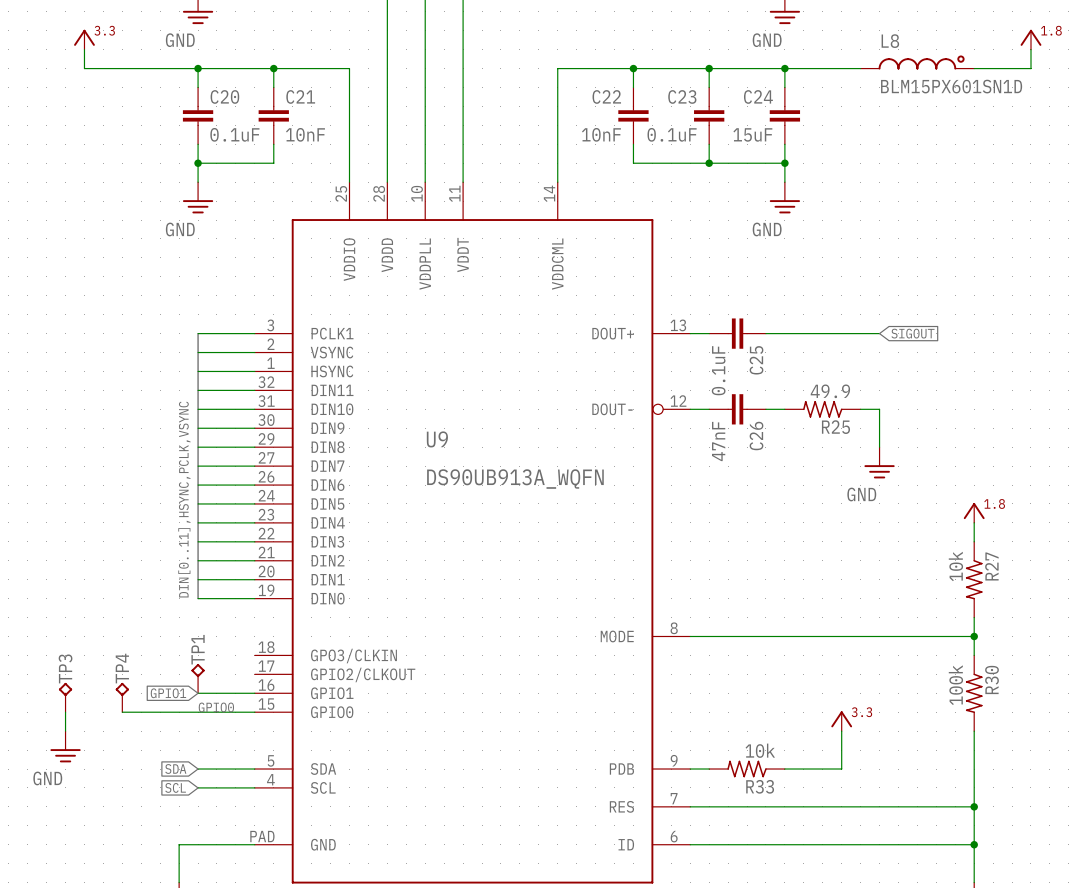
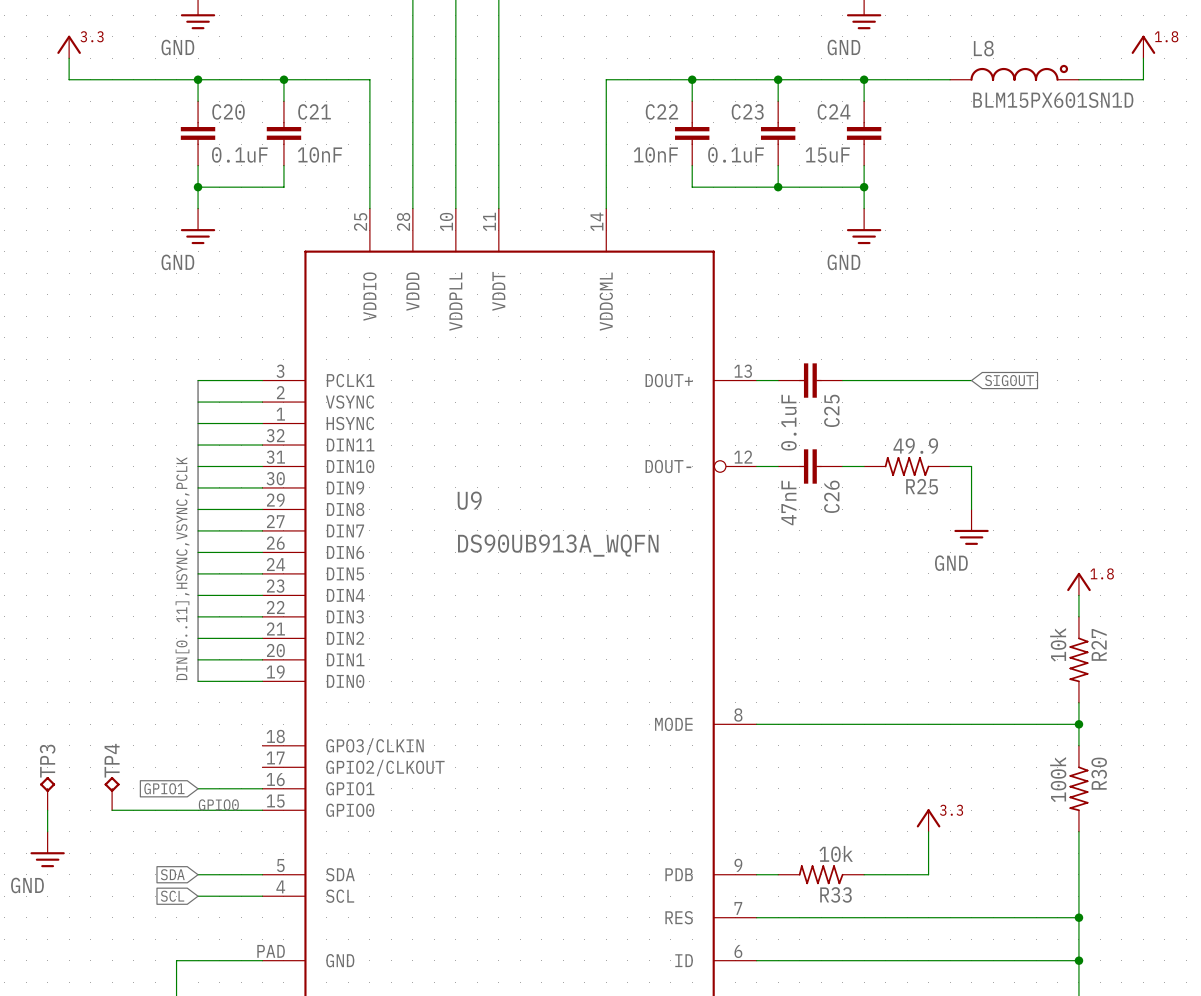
label: DIN[0..11],HSYNC,PCLK,VSYNC (184, 499) -> DIN[0..11],HSYNC,VSYNC,PCLK (182, 568)
TP1: (198, 678) -> none

